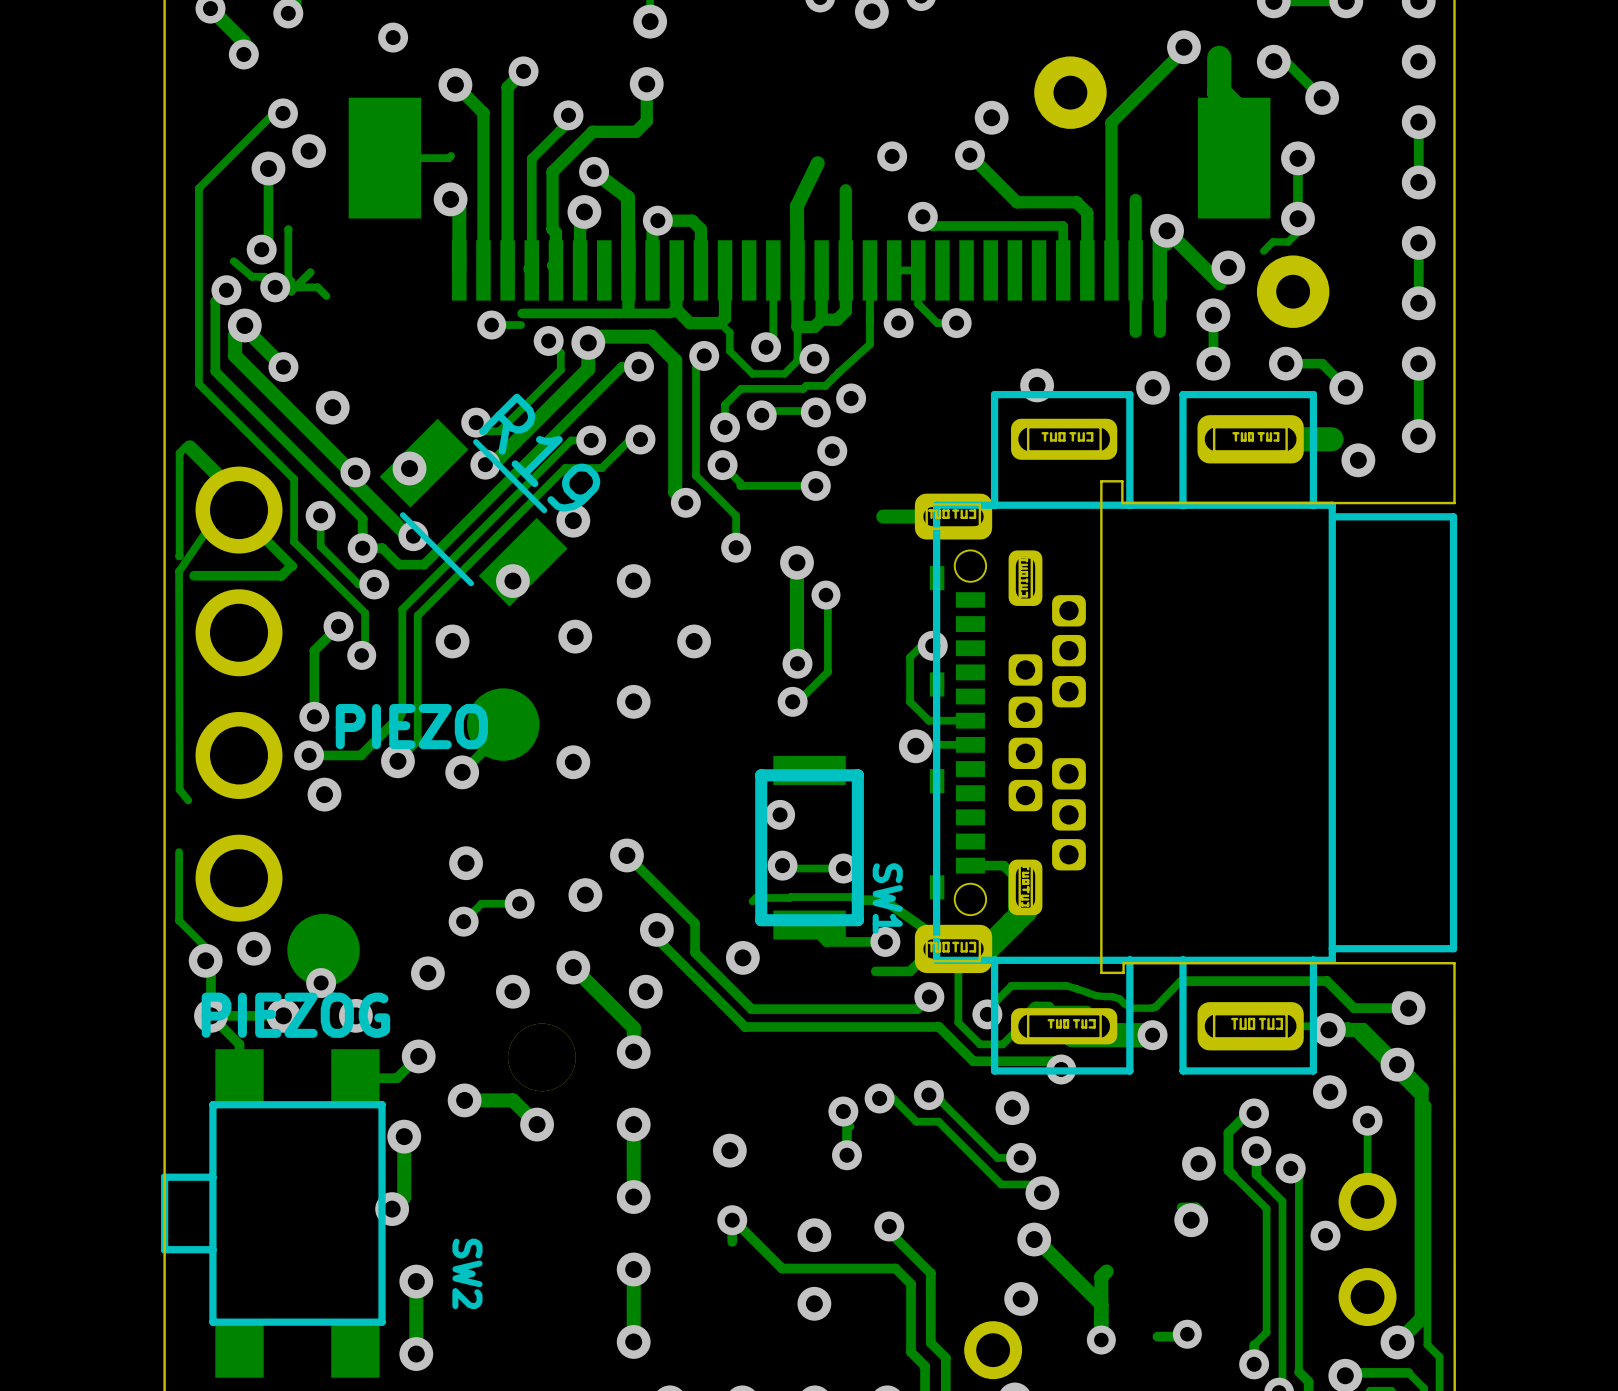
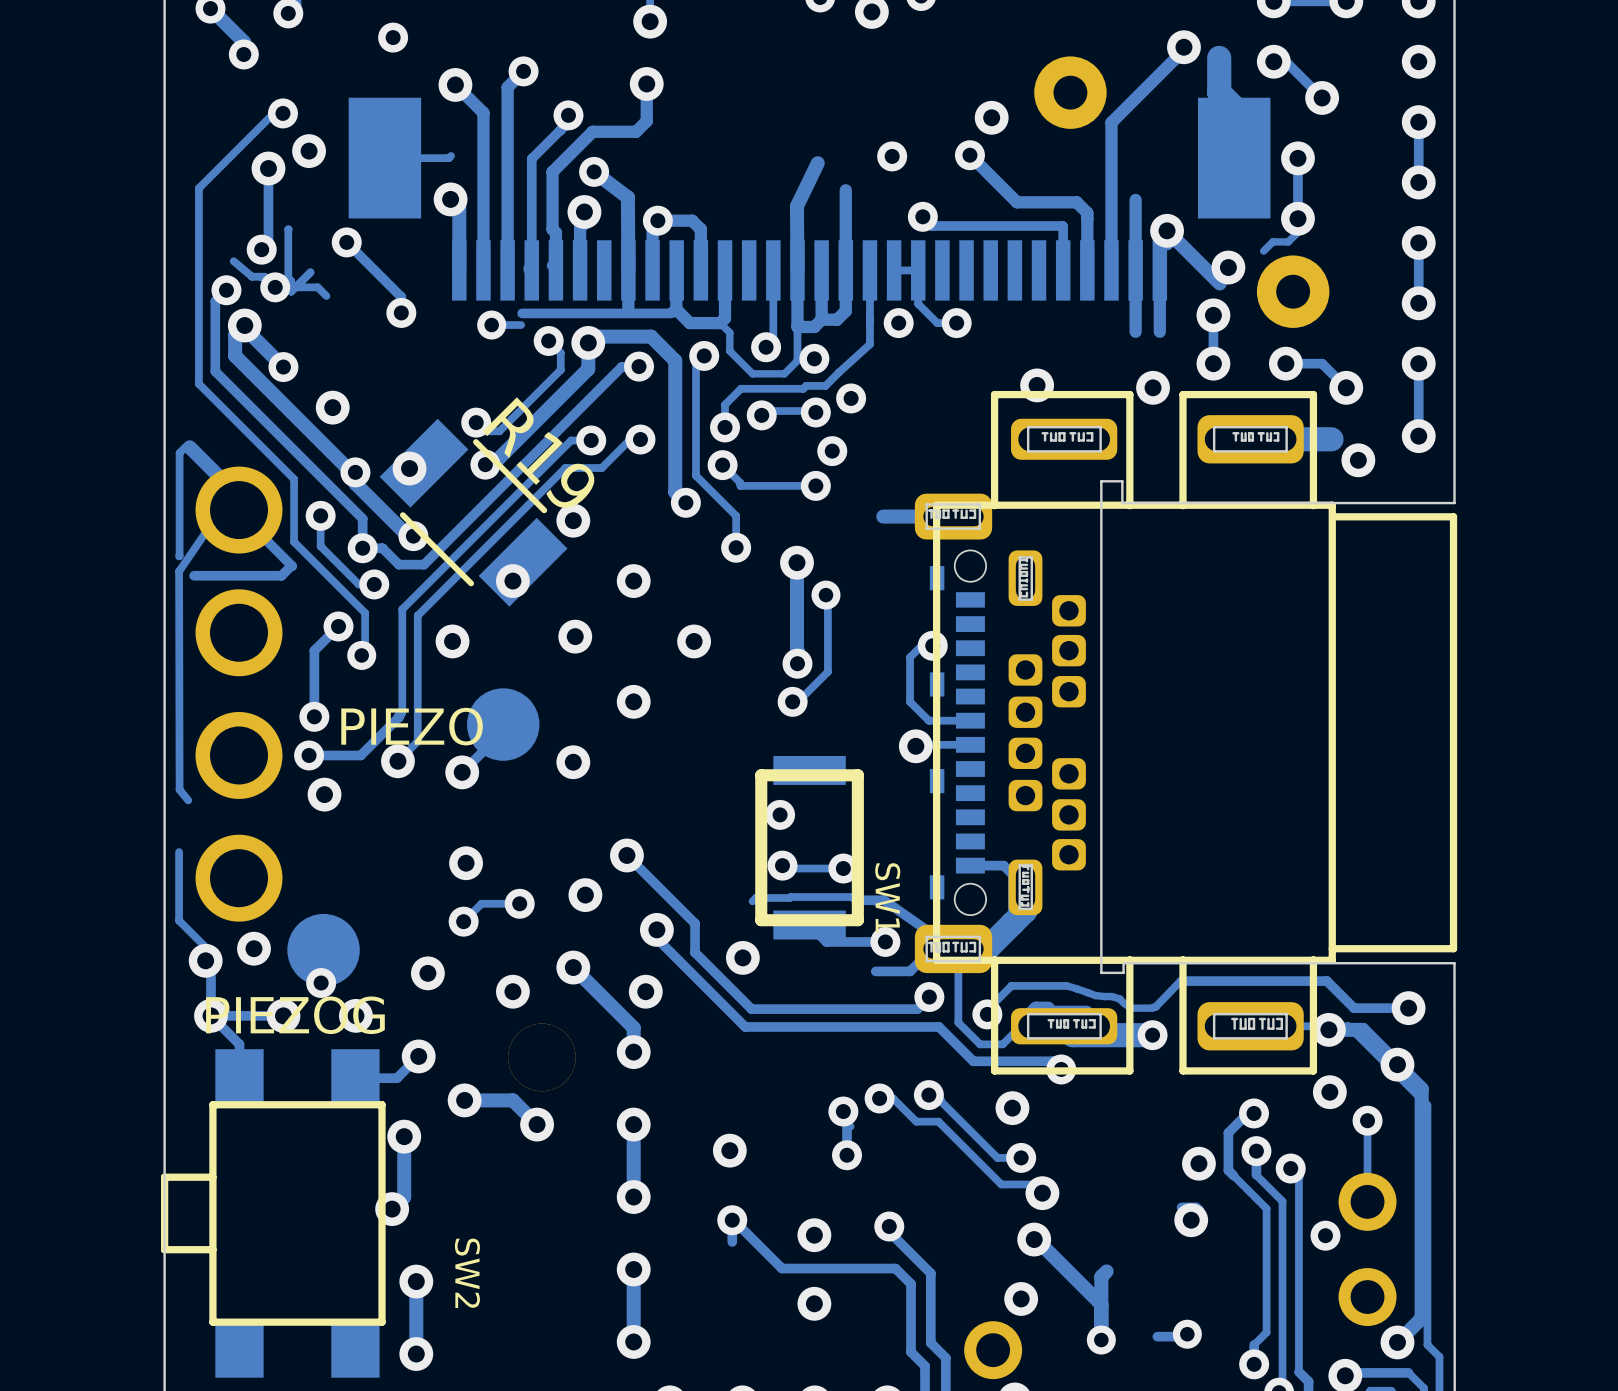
track: none -> (350, 239) (346, 242) (401, 297) (401, 312)
via: none -> (346, 242)
via: none -> (401, 312)

